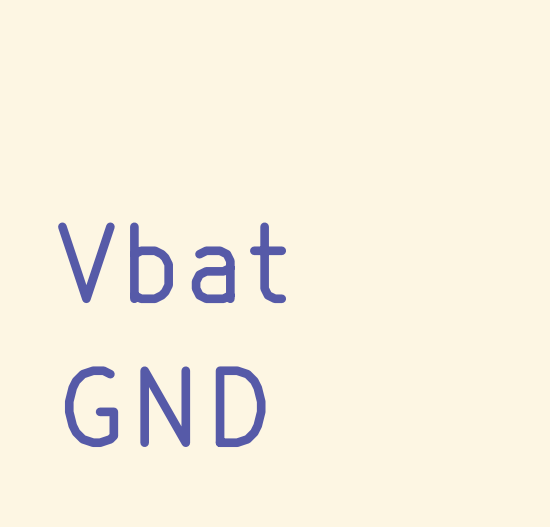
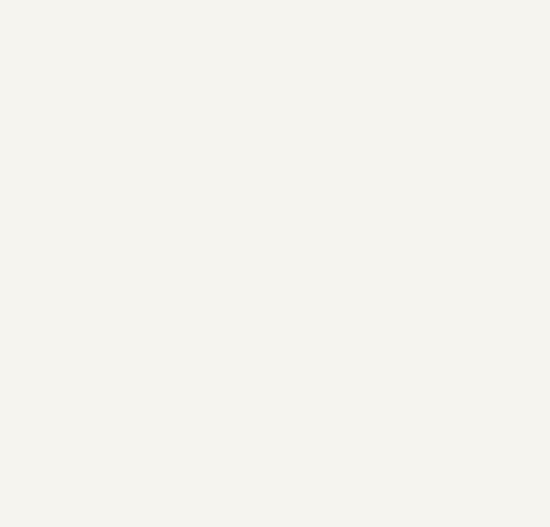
text: Vbat (172, 262) -> none
text: GND (165, 406) -> none

